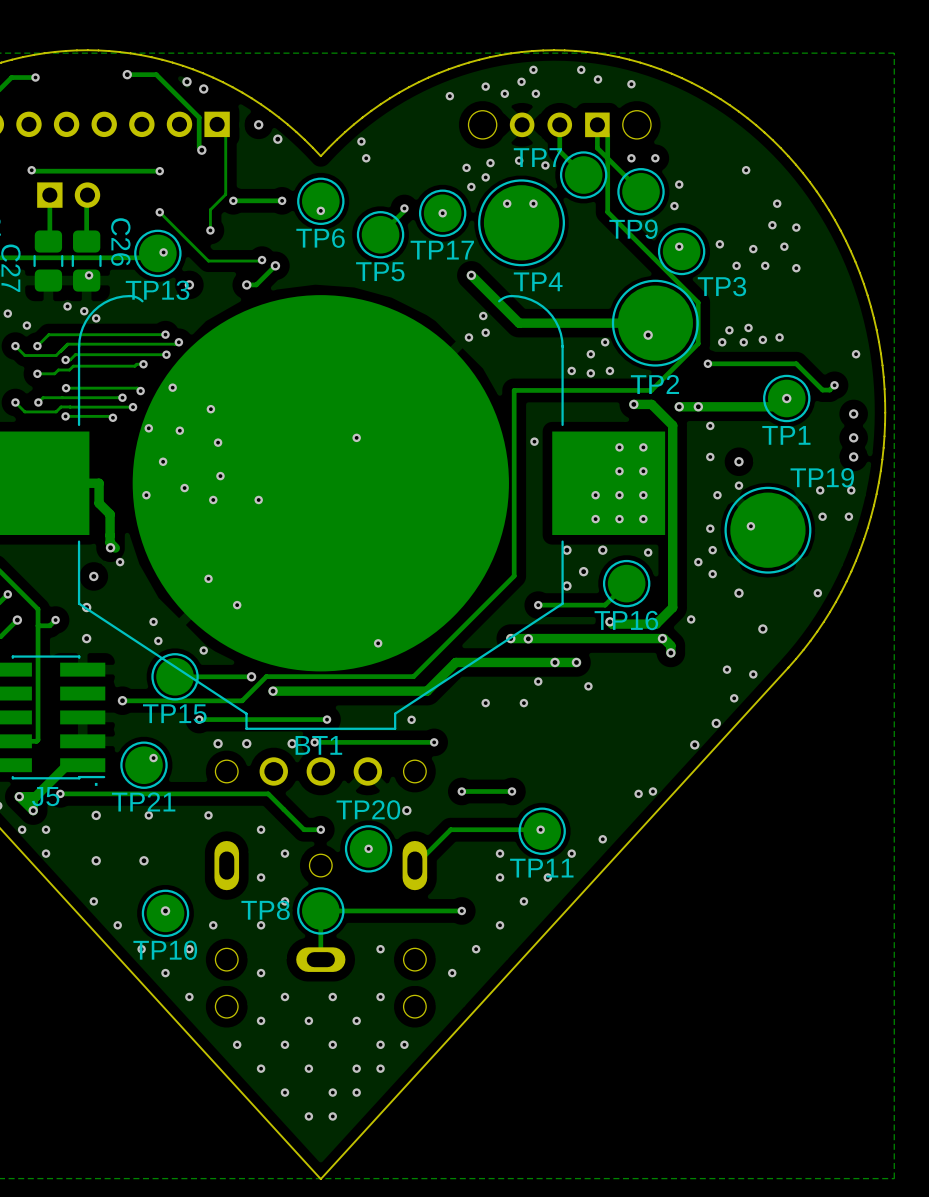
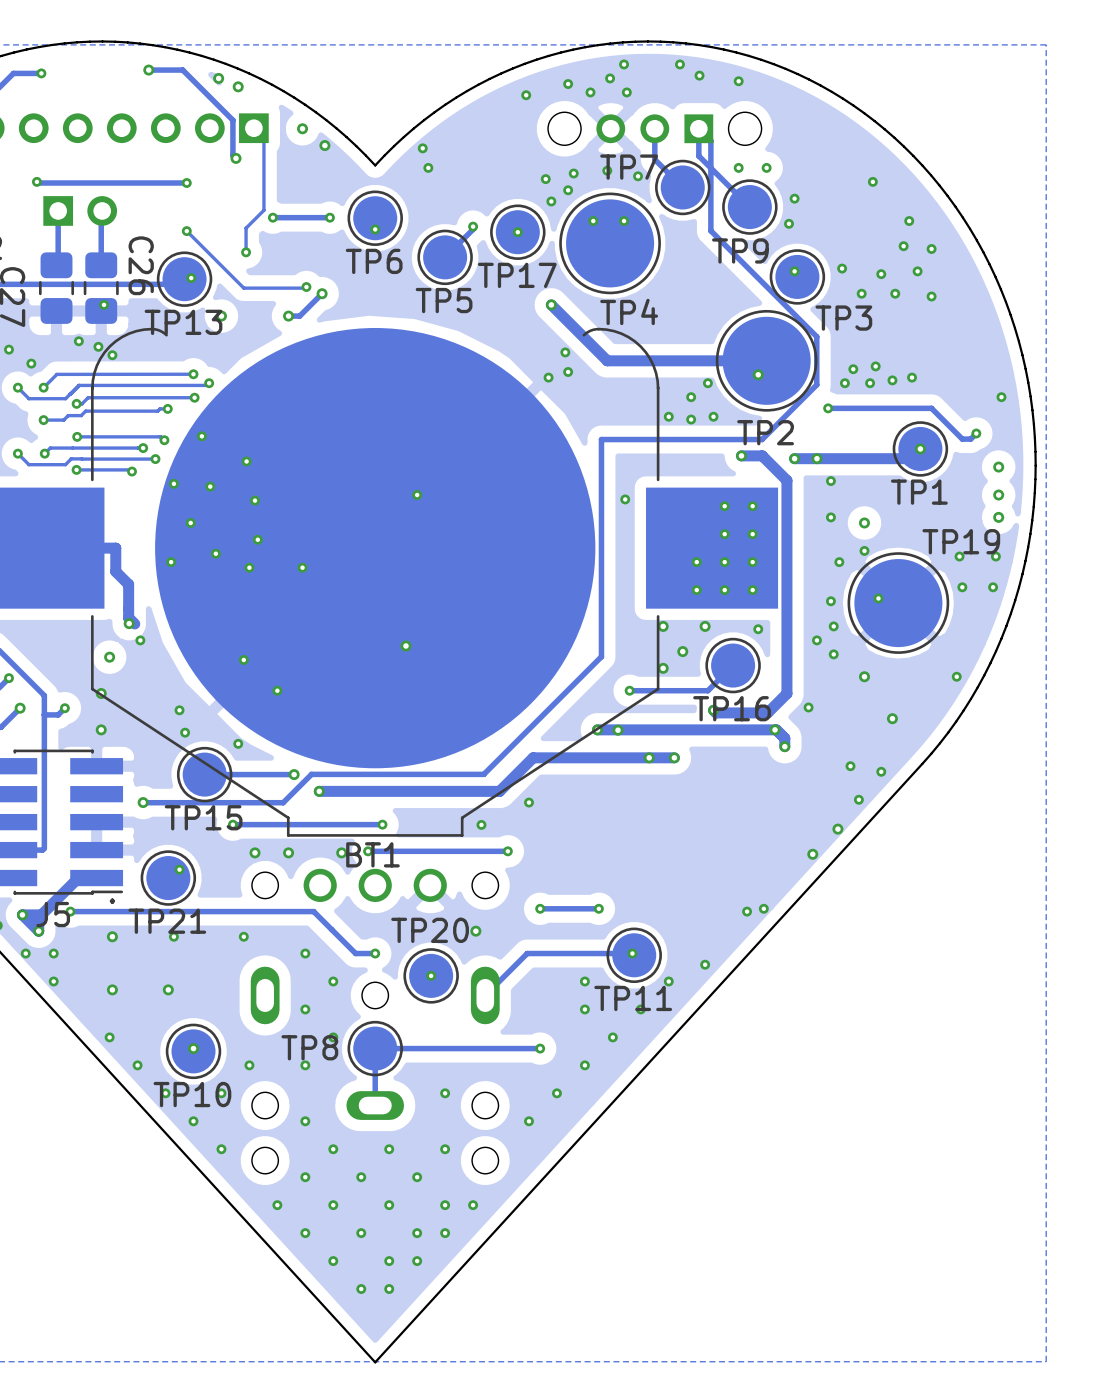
via: none -> (405, 645)
via: (378, 643) -> none
via: (538, 681) -> none
via: (588, 686) -> none
via position: (485, 703) -> (528, 802)
via: (523, 703) -> none

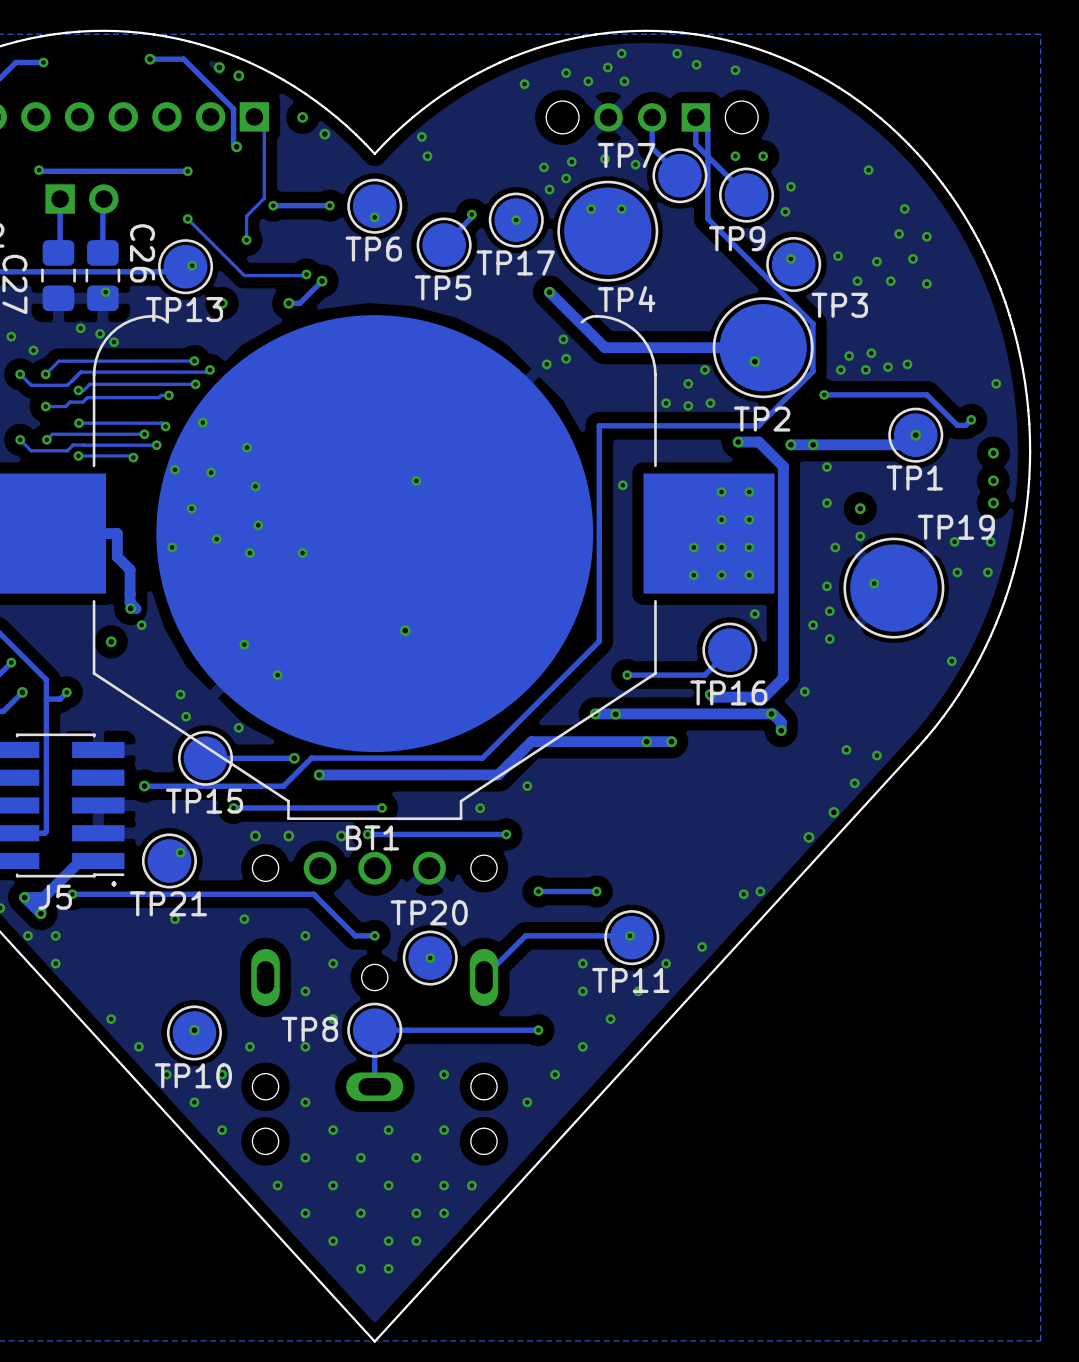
via: (663, 626) -> none
via: (705, 626) -> none
via: (682, 651) -> none
via: (663, 668) -> none
via: (864, 676) -> none
via: (101, 693) -> none
via: (892, 718) -> none
via: (101, 729) -> none
via: (475, 931) -> none
via: (112, 936) -> none
via: (112, 989) -> none
via: (168, 989) -> none

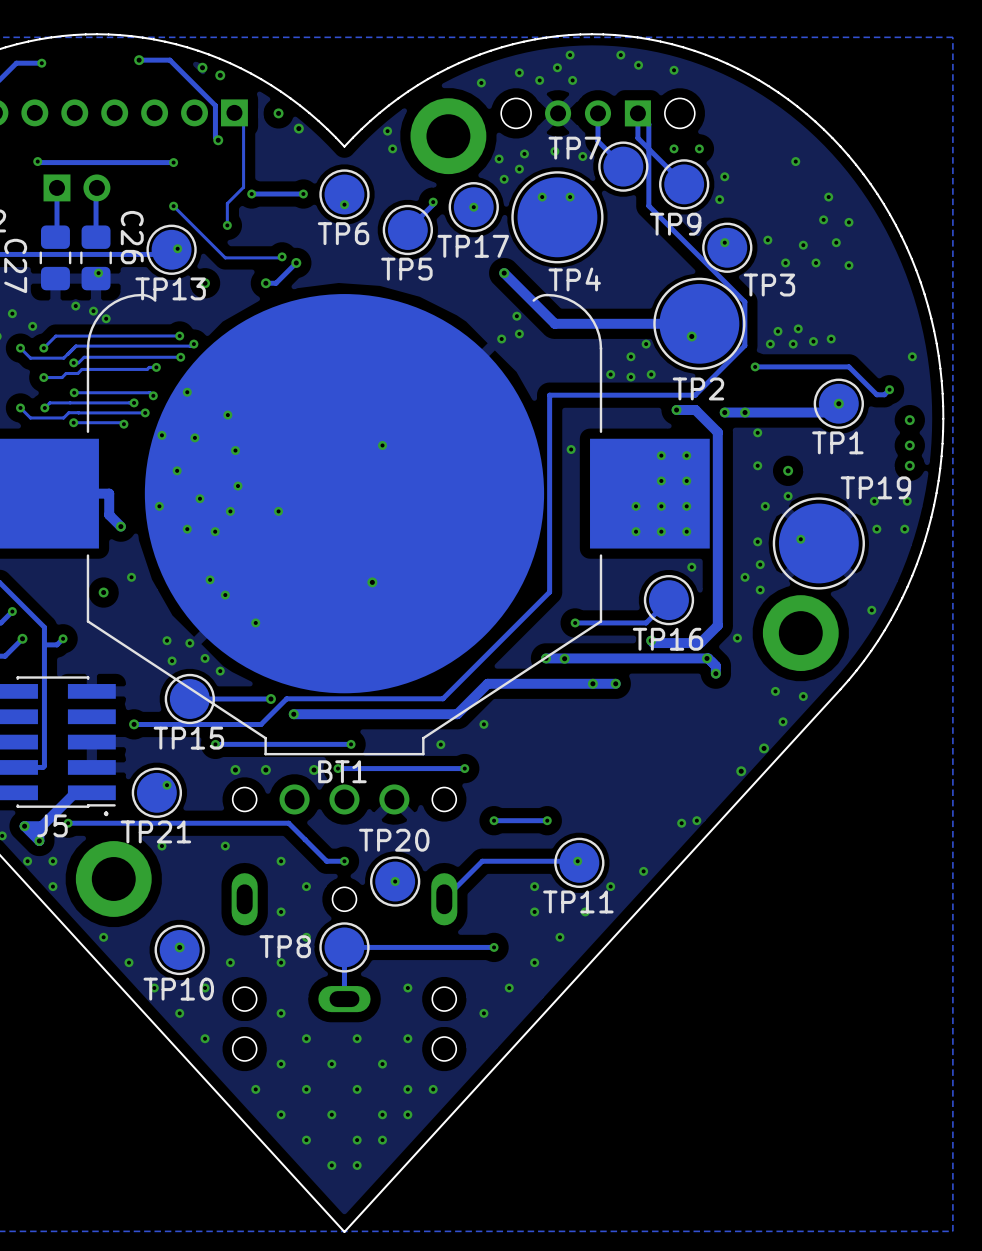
part: none -> (448, 136)
track: (130, 569) (130, 602) (136, 608) -> none
via: none -> (187, 529)
via: none -> (215, 531)
via position: (130, 608) -> (120, 526)
via: none -> (210, 579)
part: none -> (800, 633)
via: none -> (189, 643)
via: none -> (205, 658)
part: none -> (113, 878)

